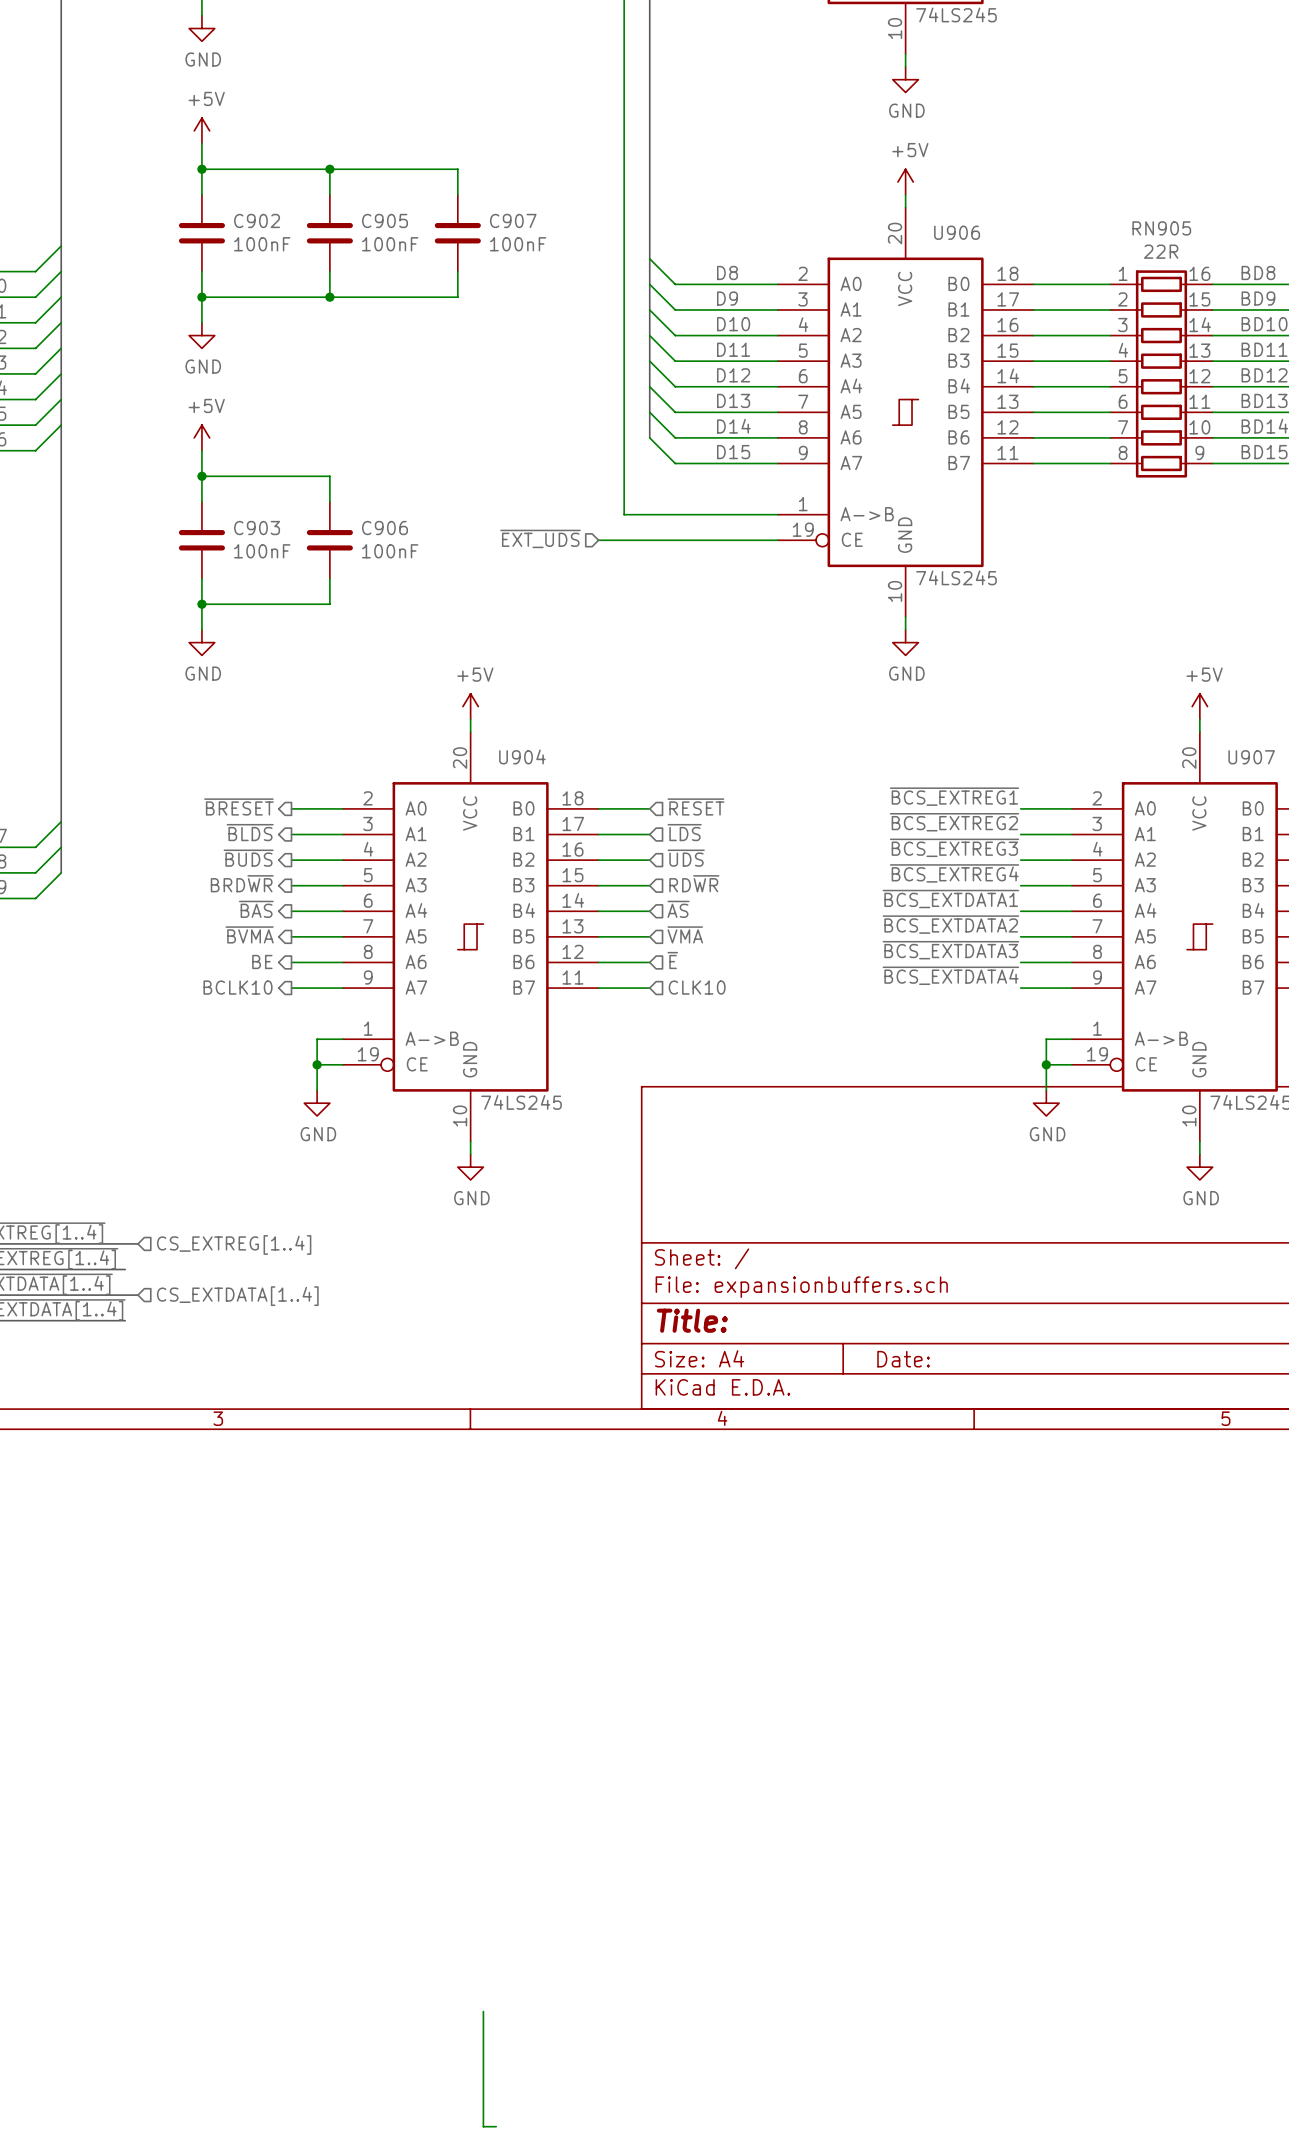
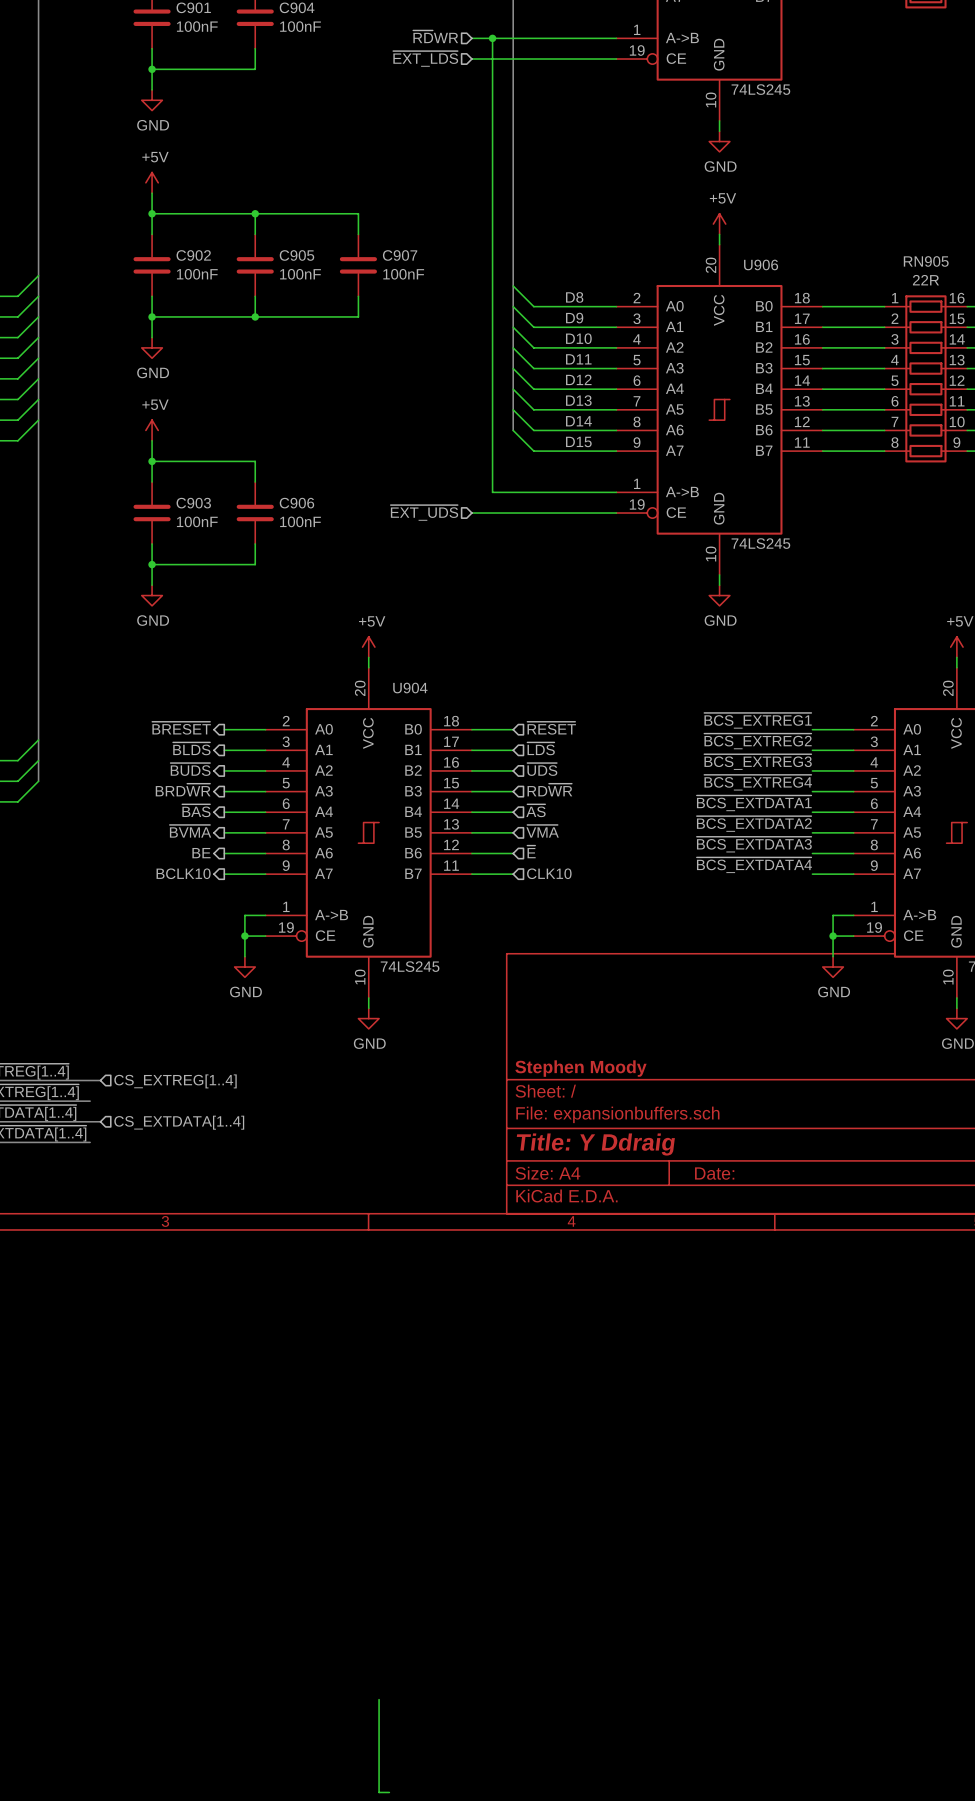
title block: none -> Stephen Moody (580, 1068)
title block: Title: (692, 1320) -> Title: Y Ddraig (595, 1144)

